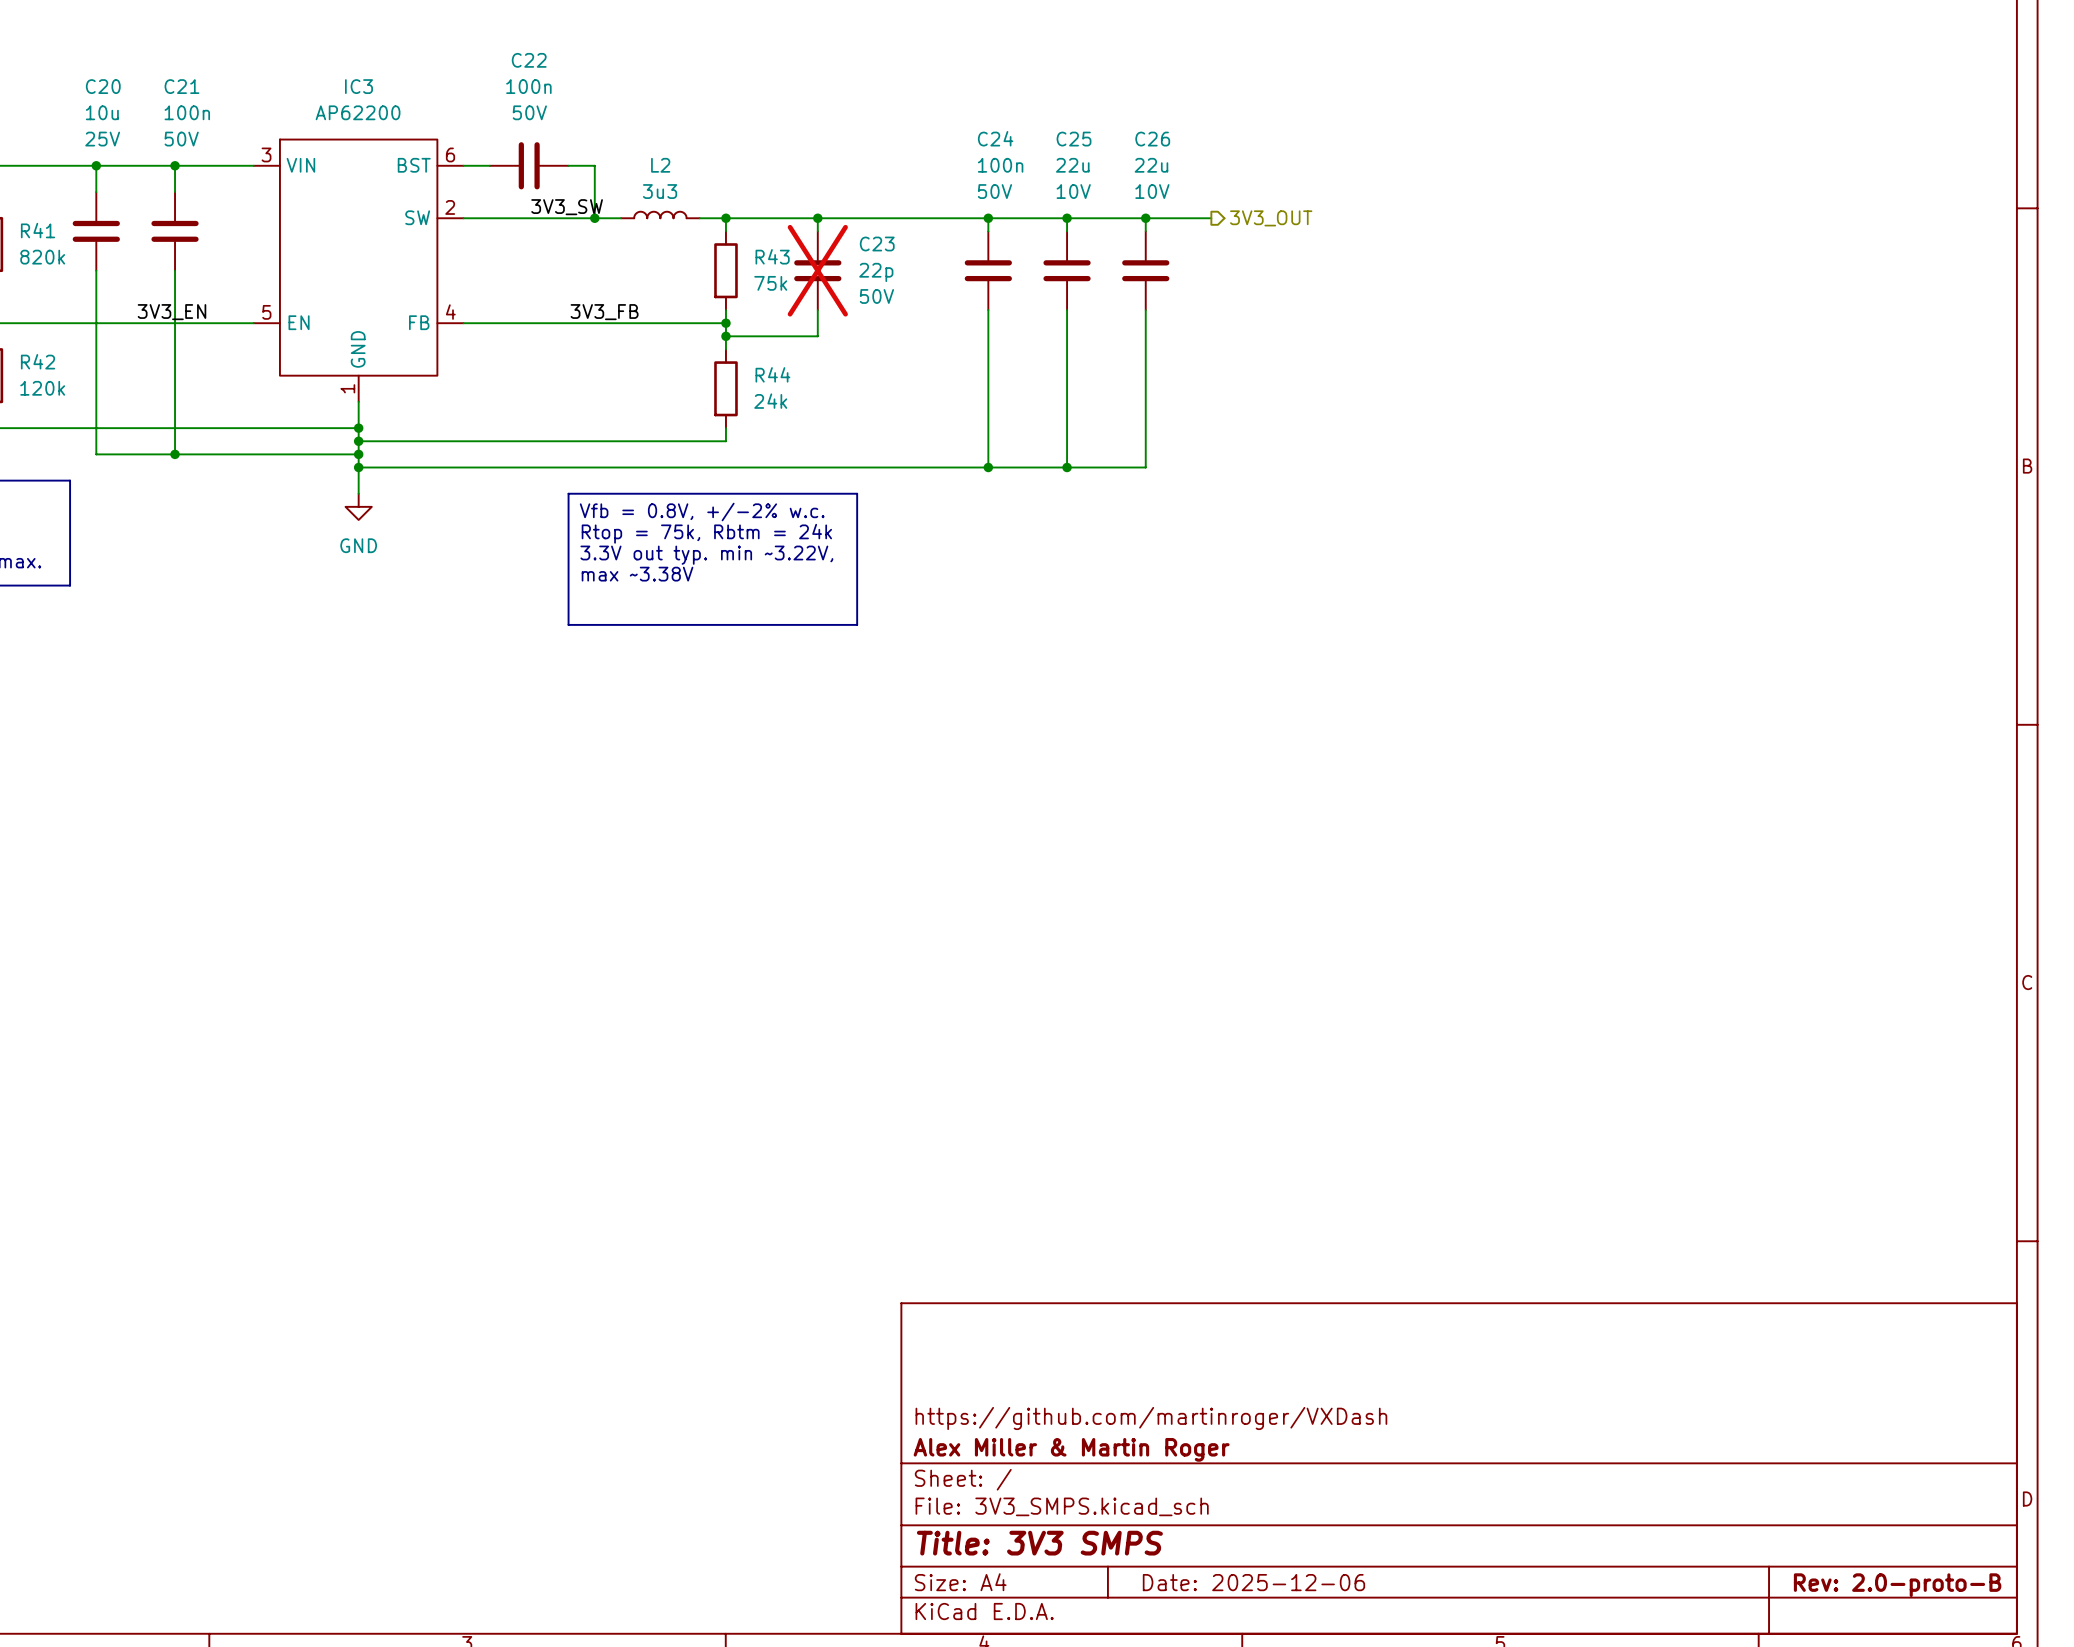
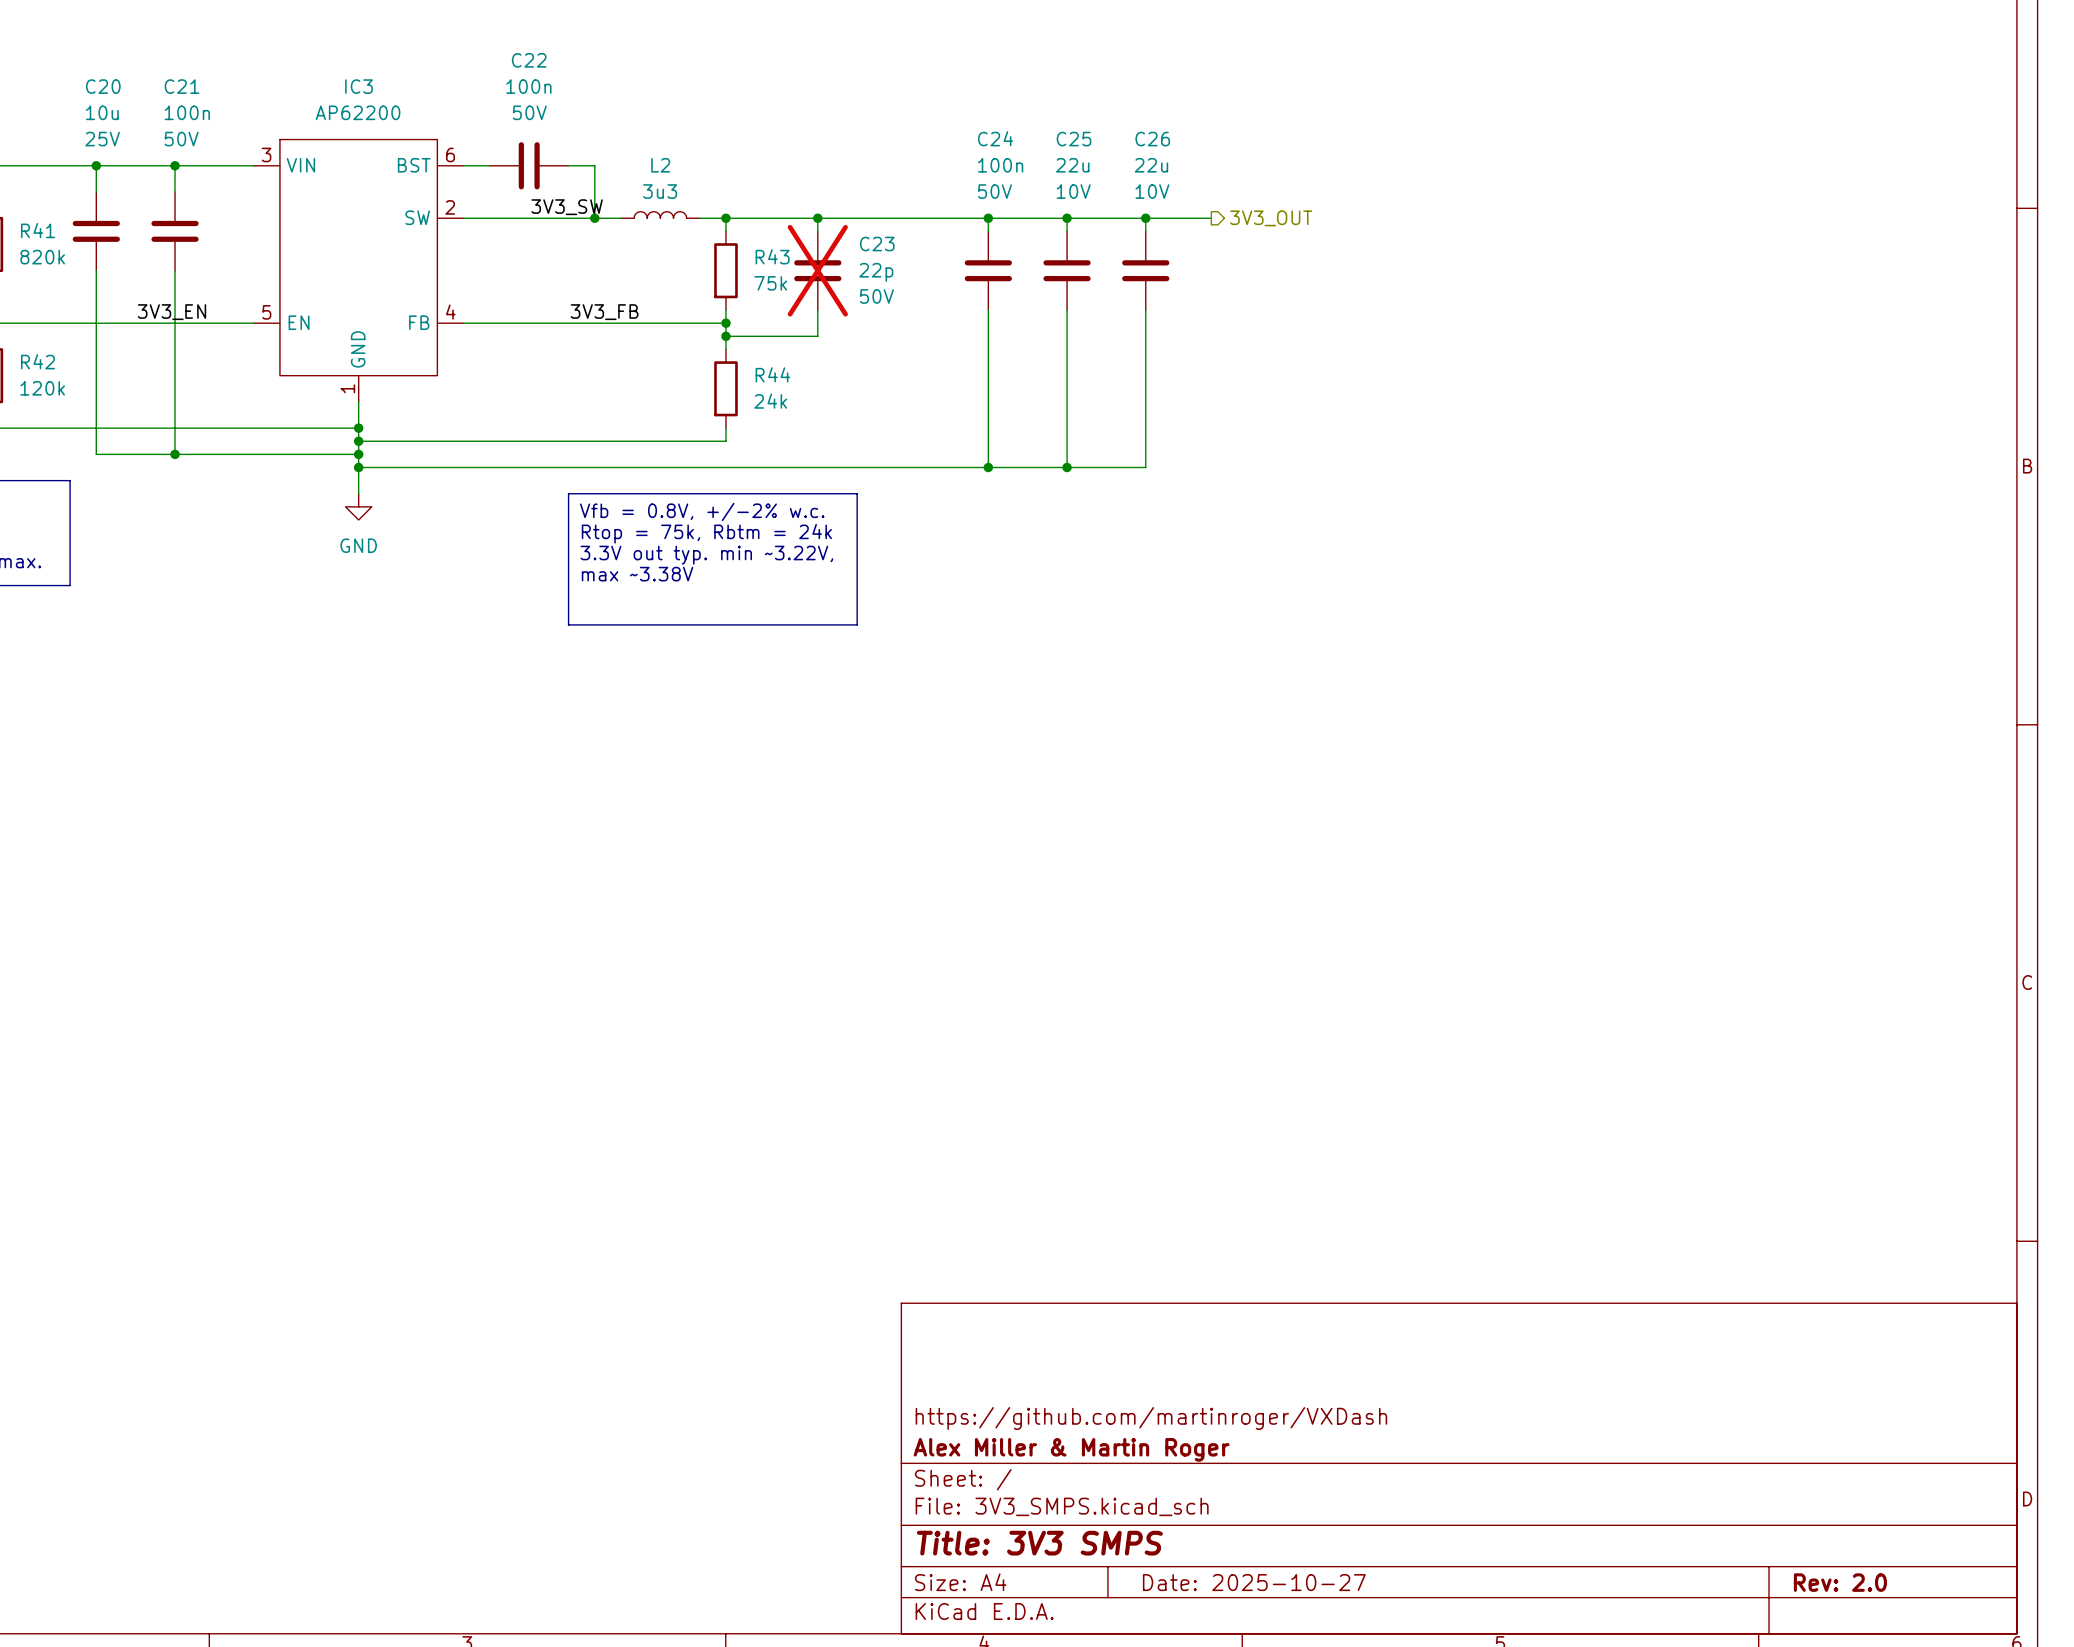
title block: Date: 2025-12-06 (1253, 1582) -> Date: 2025-10-27 (1254, 1582)
title block: Rev: 2.0-proto-B (1897, 1585) -> Rev: 2.0 (1840, 1582)

